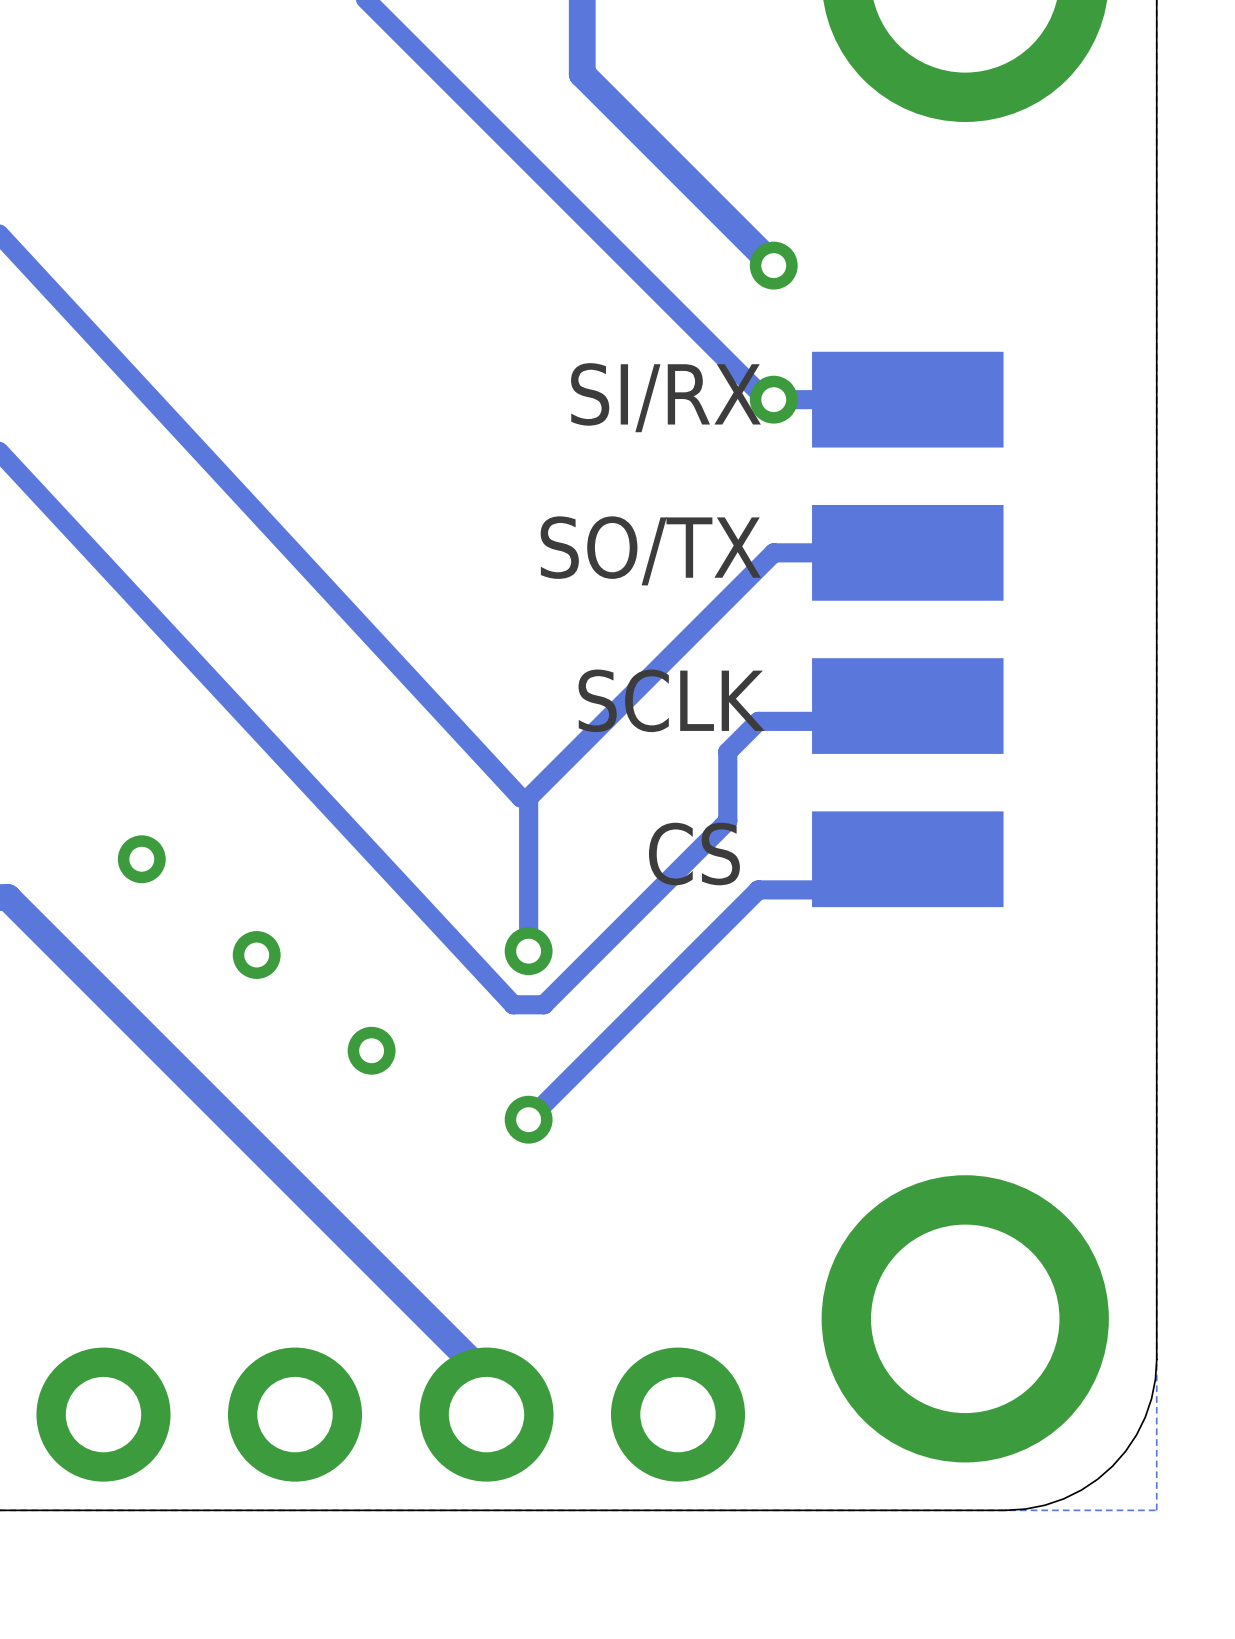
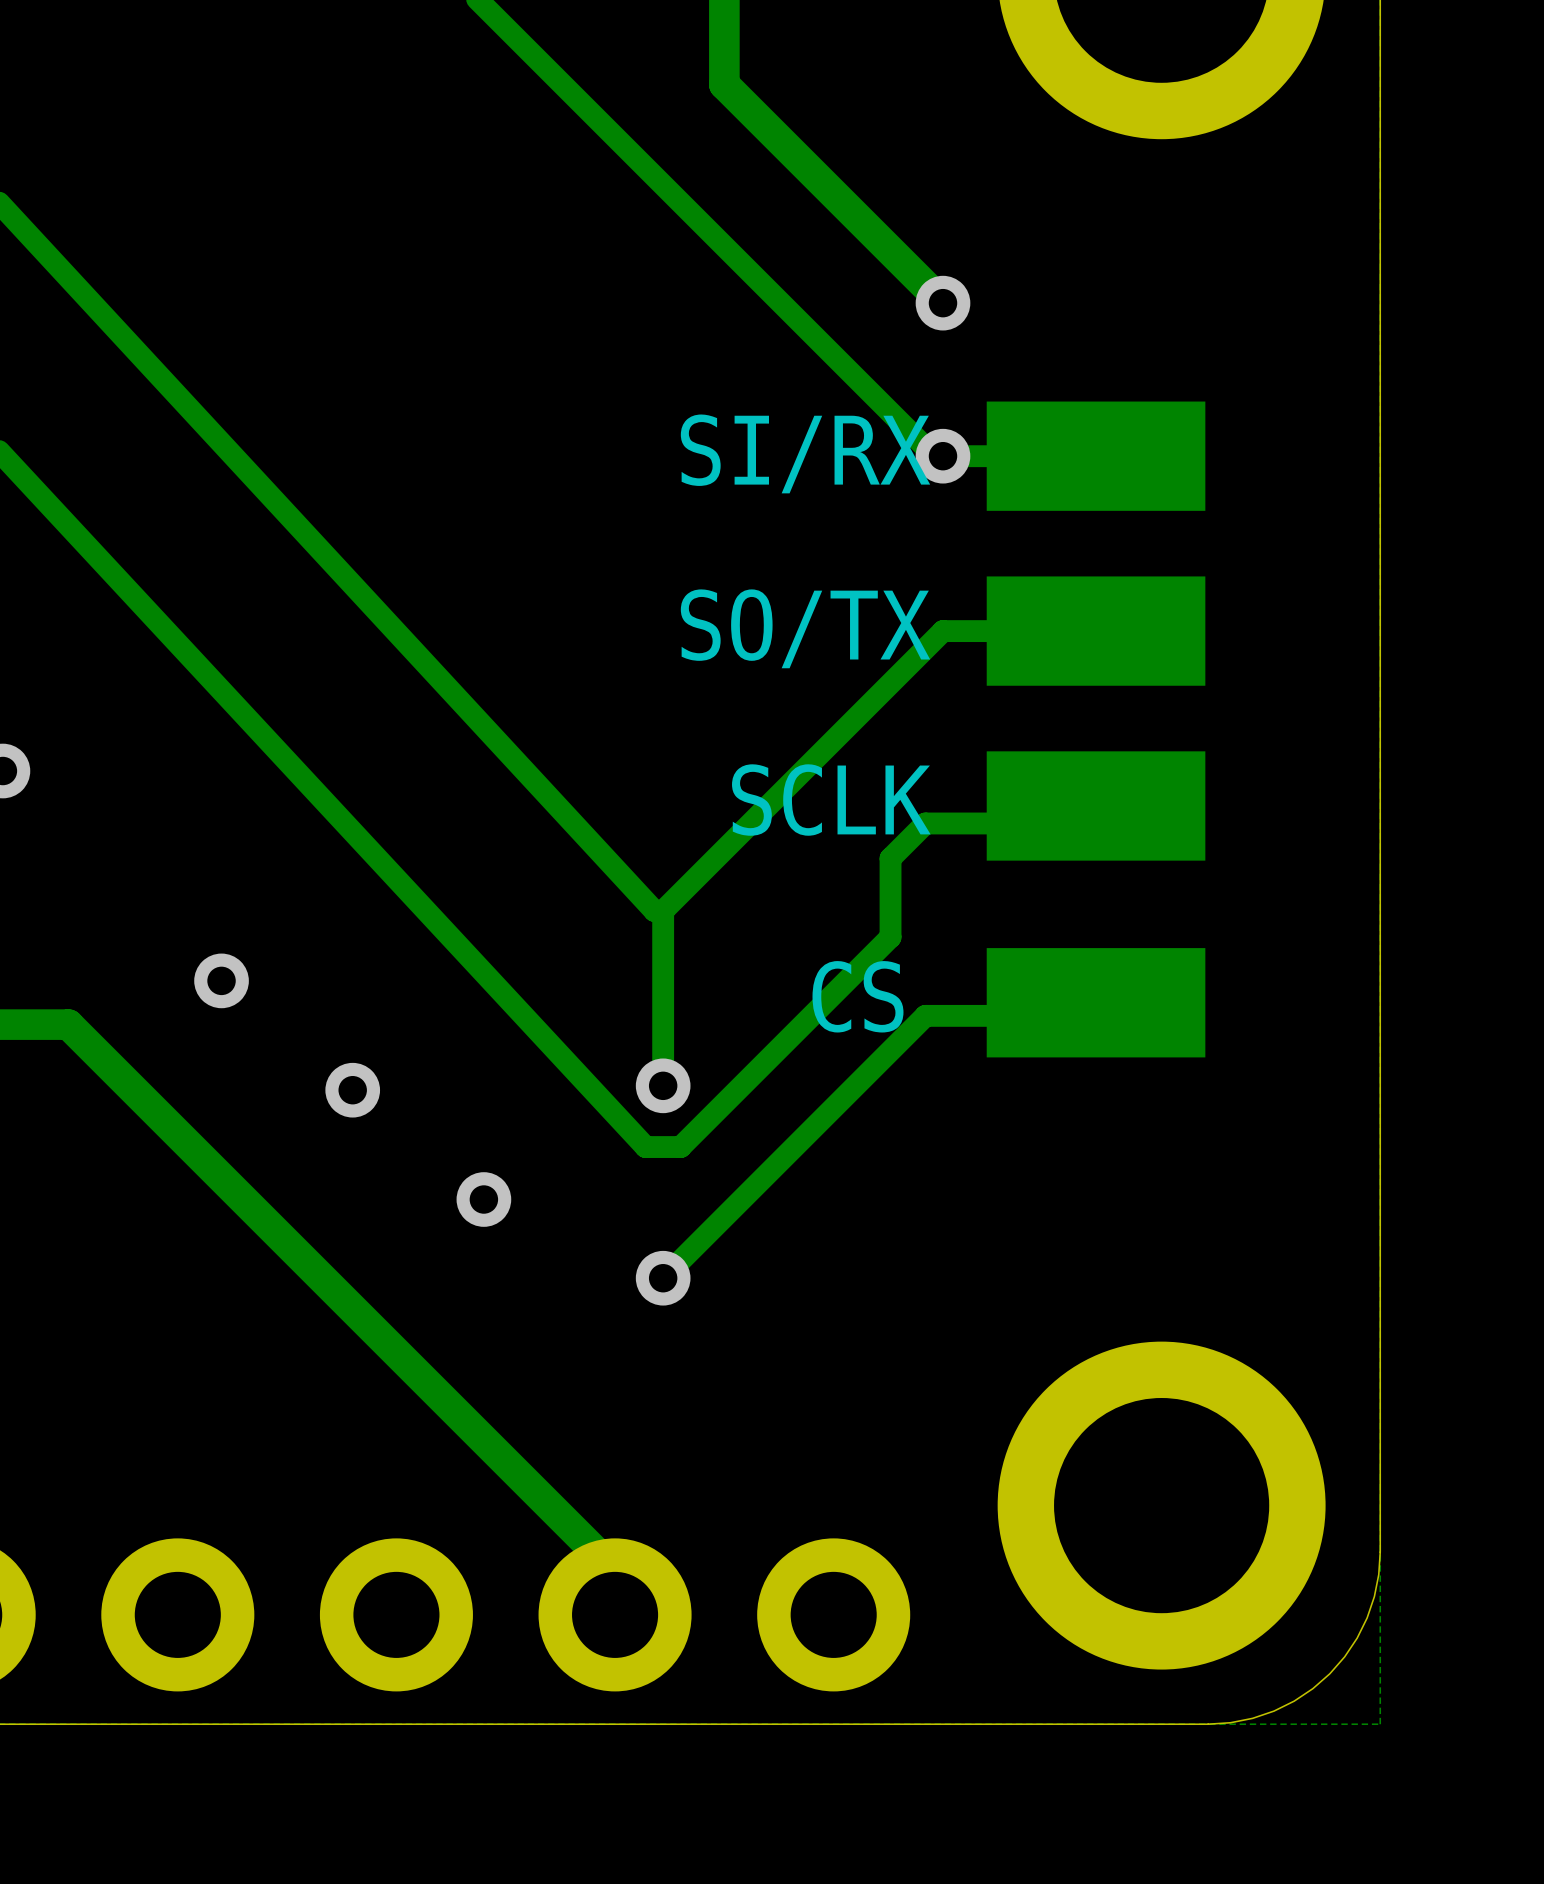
CS position: (907, 859) -> (1096, 1002)

